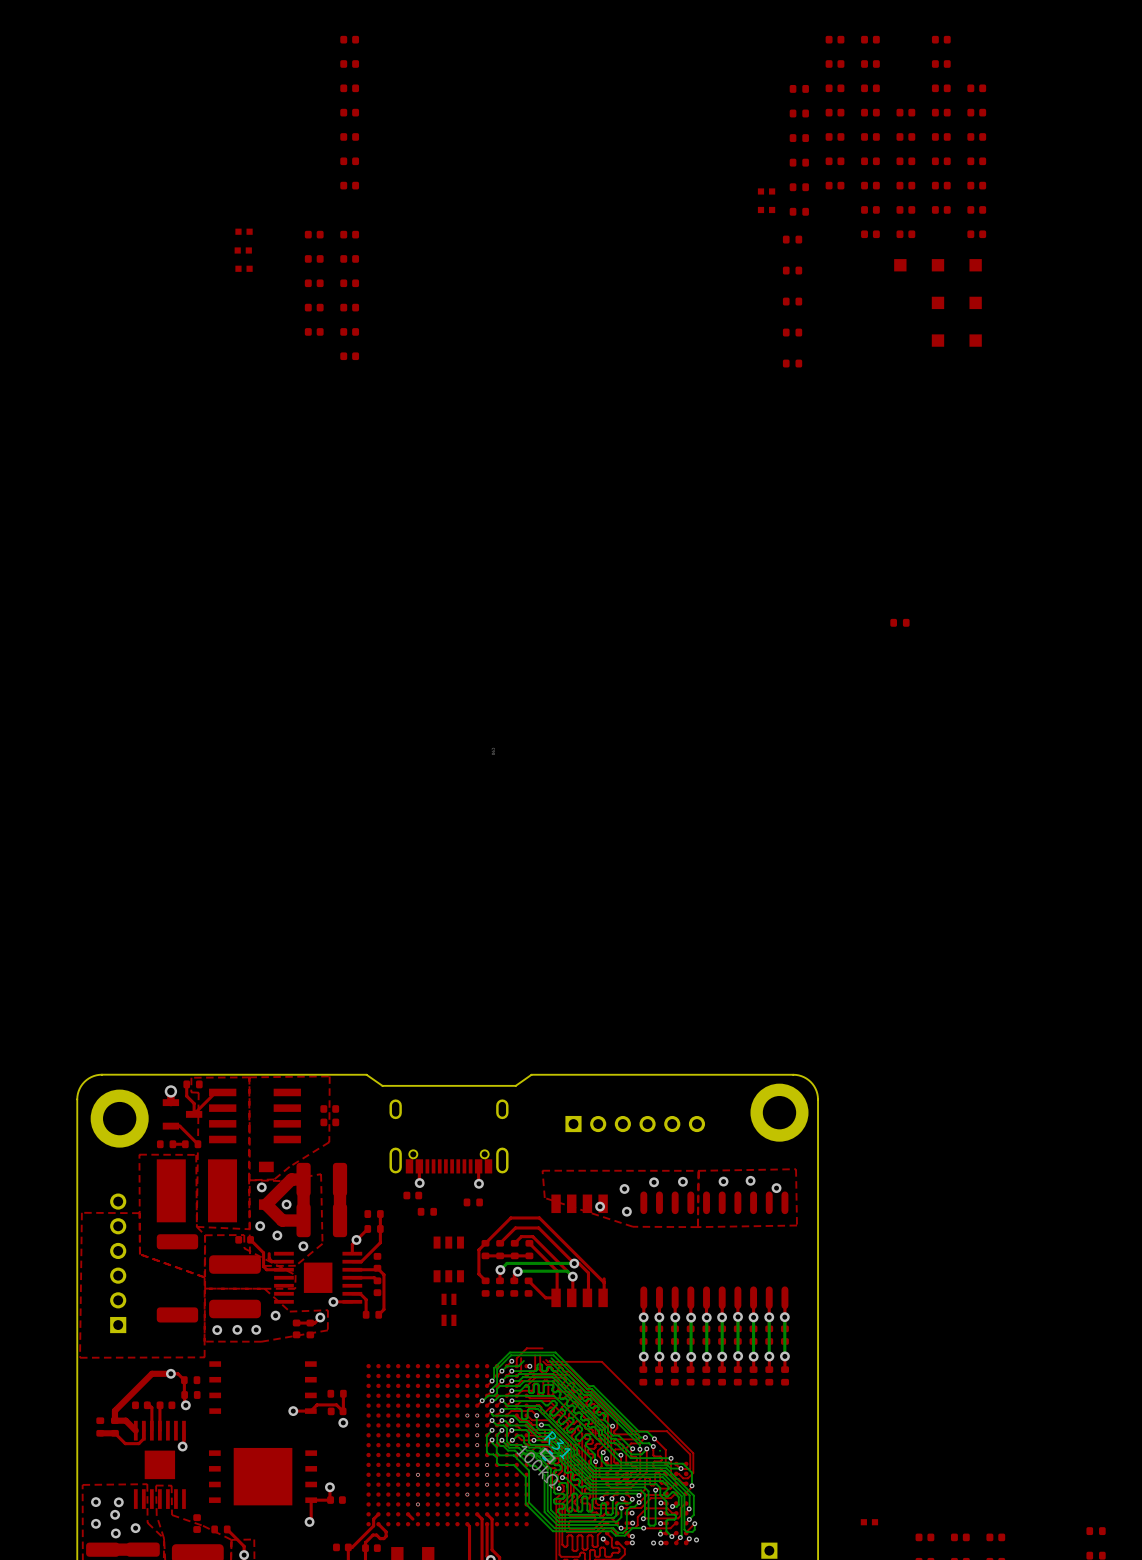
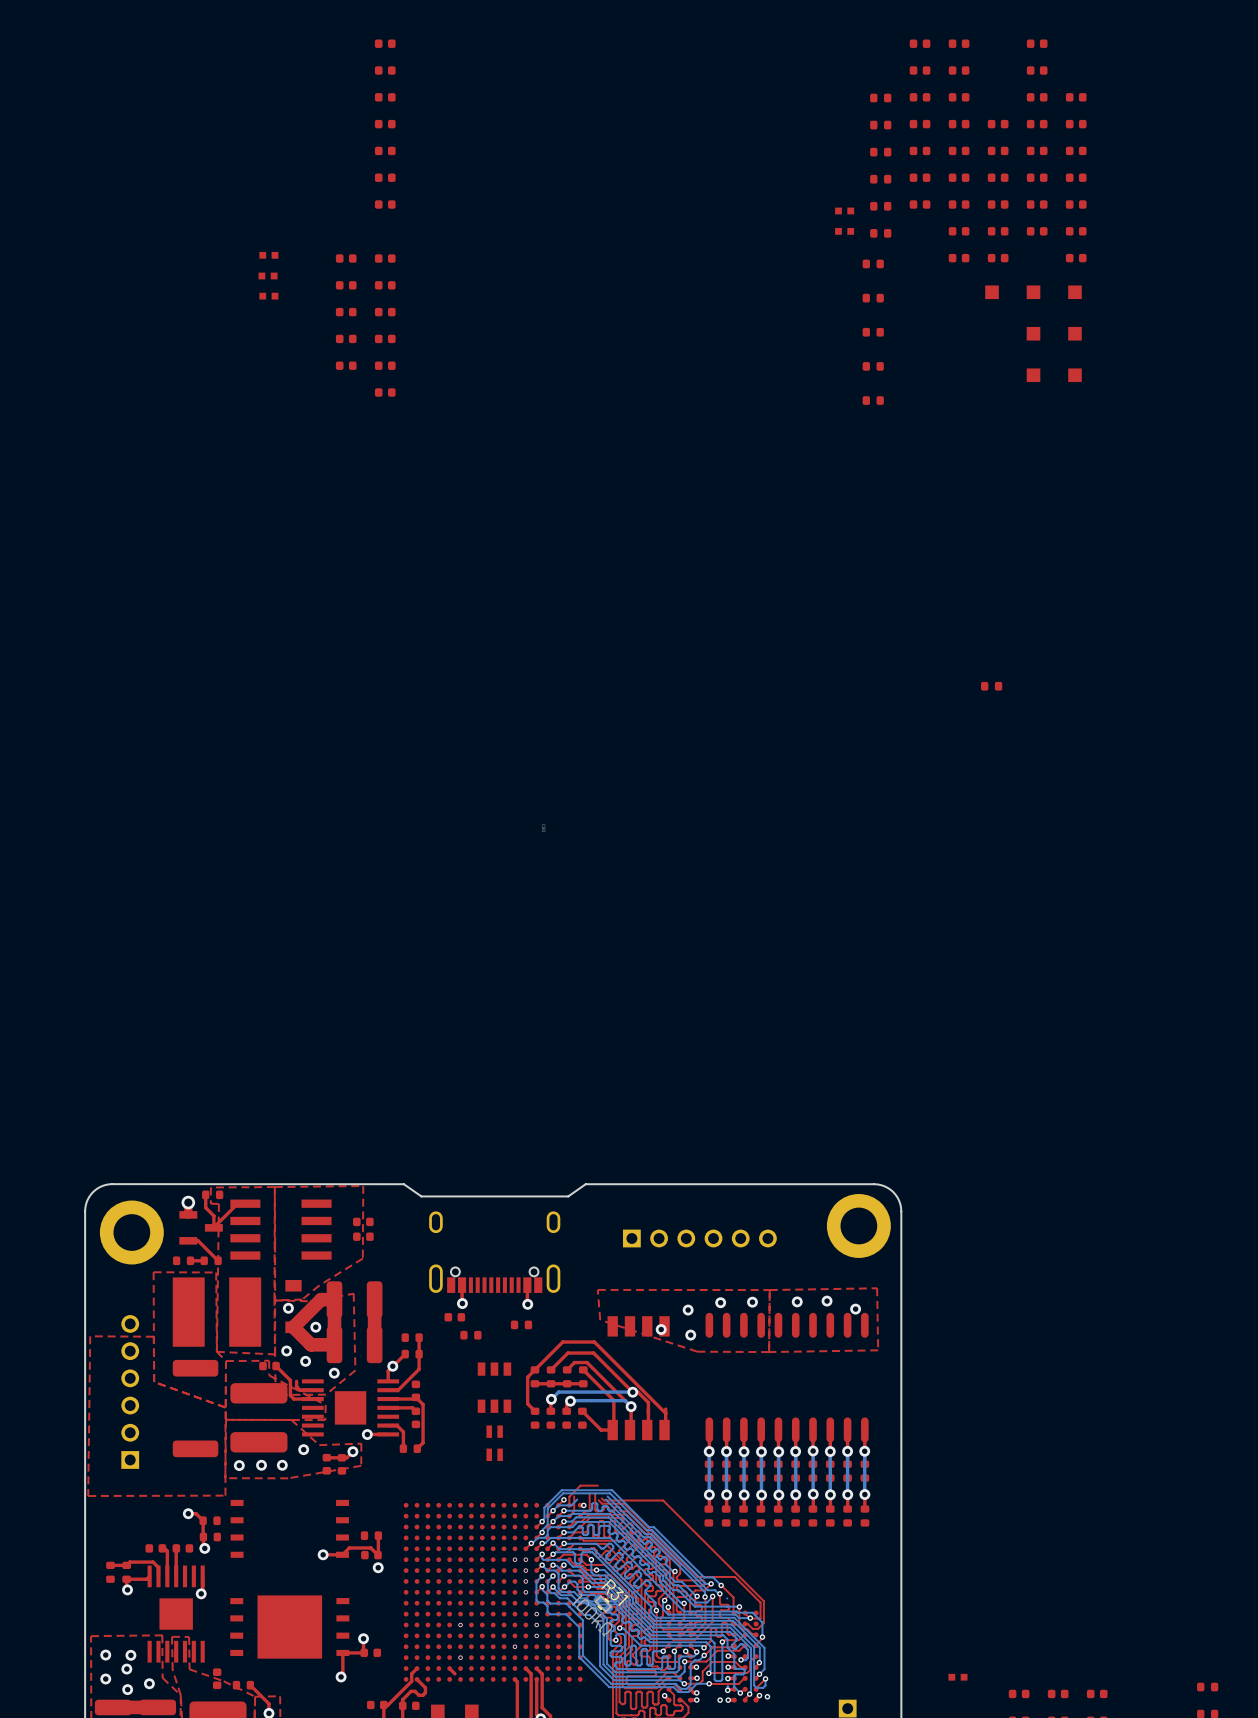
top track: (170, 1373) (151, 1373) (114, 1410) (114, 1420) (125, 1420) (135, 1430) -> (127, 1589) (126, 1579) (146, 1579) (149, 1576)
top track: none -> (110, 1565) (126, 1565) (129, 1562) (153, 1562) (158, 1567)
top track: (143, 1430) (143, 1438) (138, 1443) (125, 1443) (114, 1433) (100, 1433) -> none
via: none -> (127, 1589)

